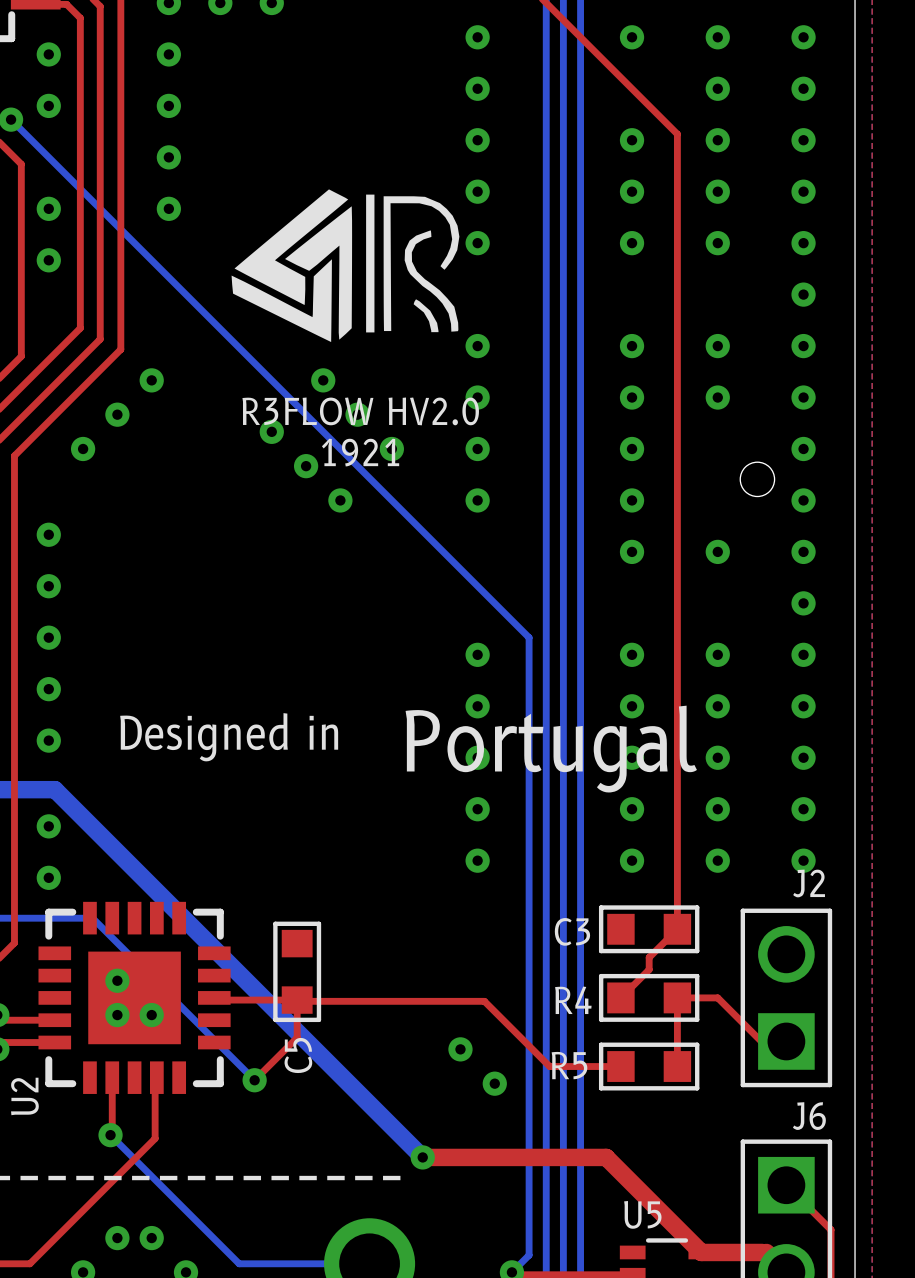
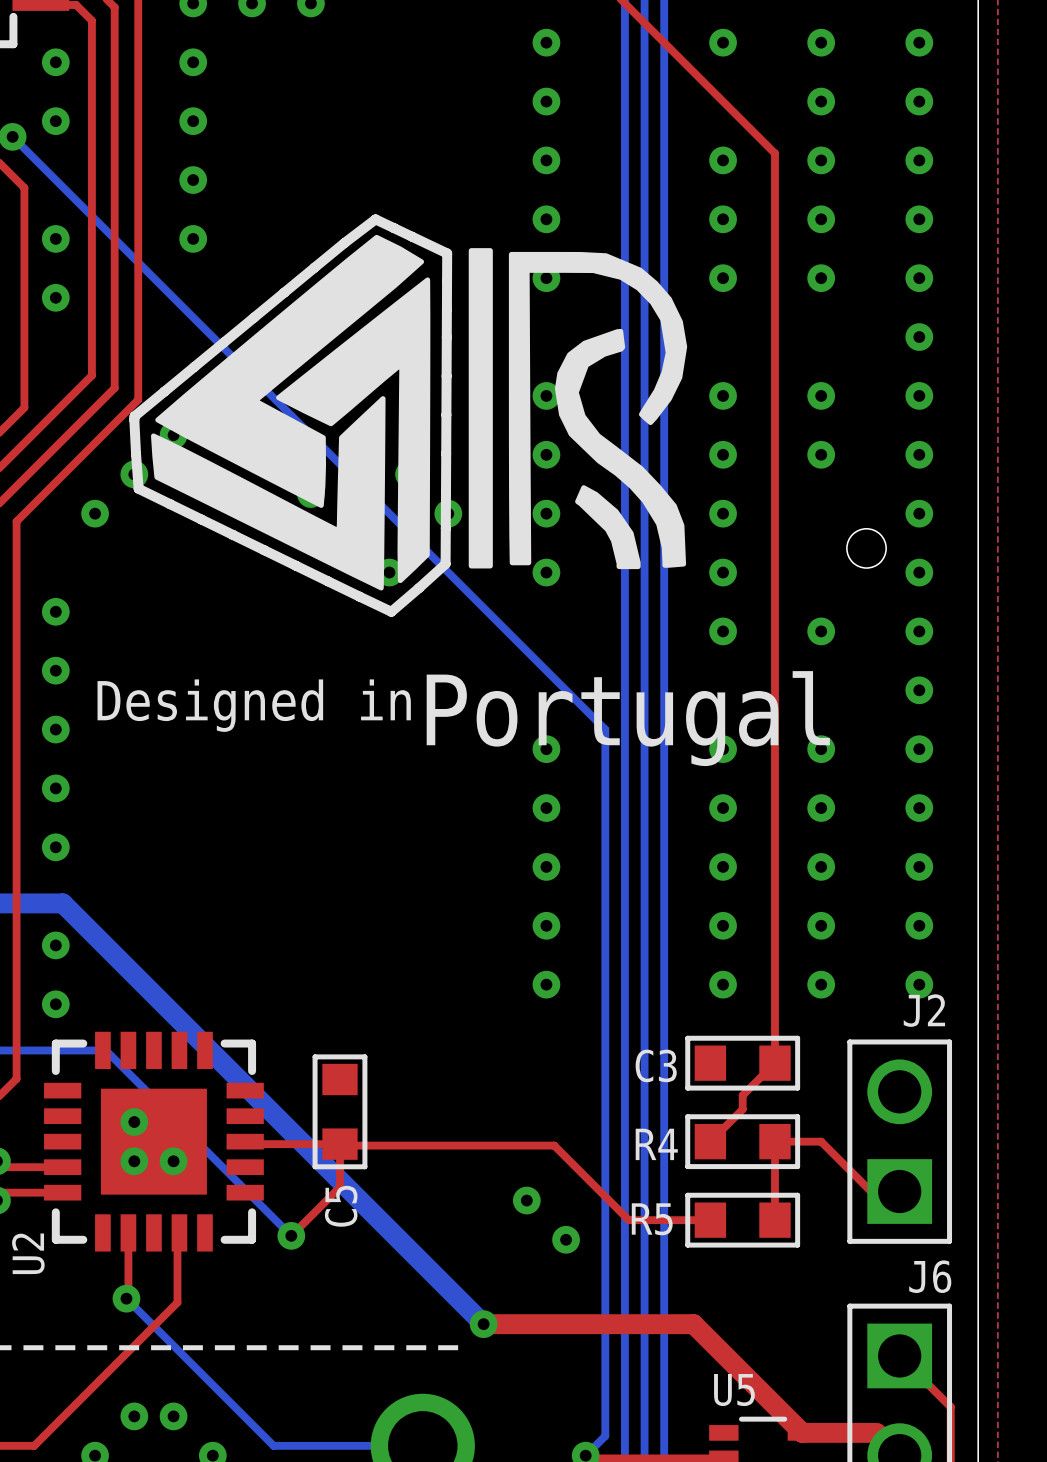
drawing: none -> [129, 214, 688, 617]
drawing: [231, 189, 460, 343] -> none
text: R3FLOW HV2.0 (360, 411) -> none
text: 1921 (360, 452) -> none
drawing position: (408, 749) -> (463, 718)

